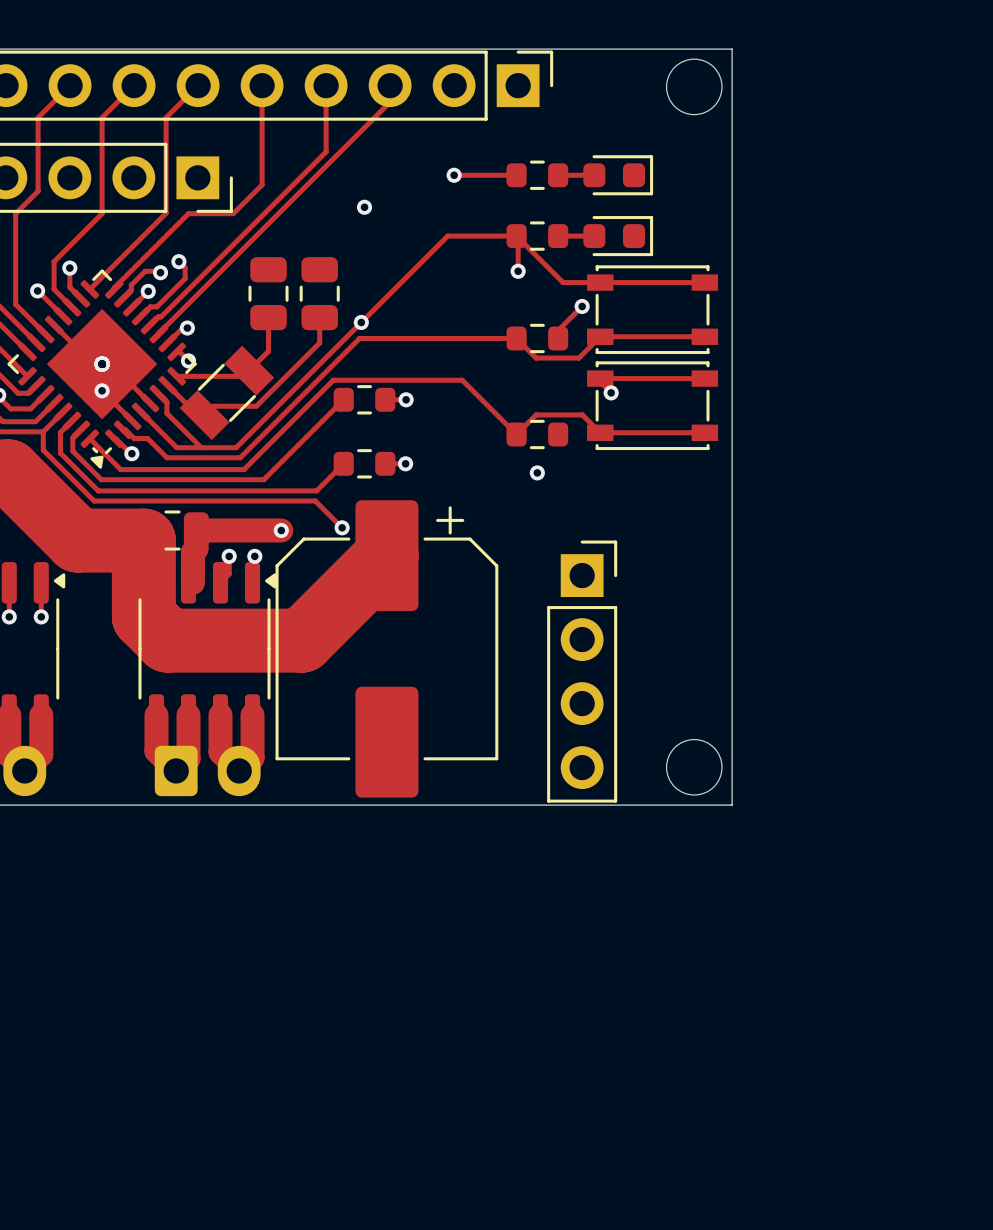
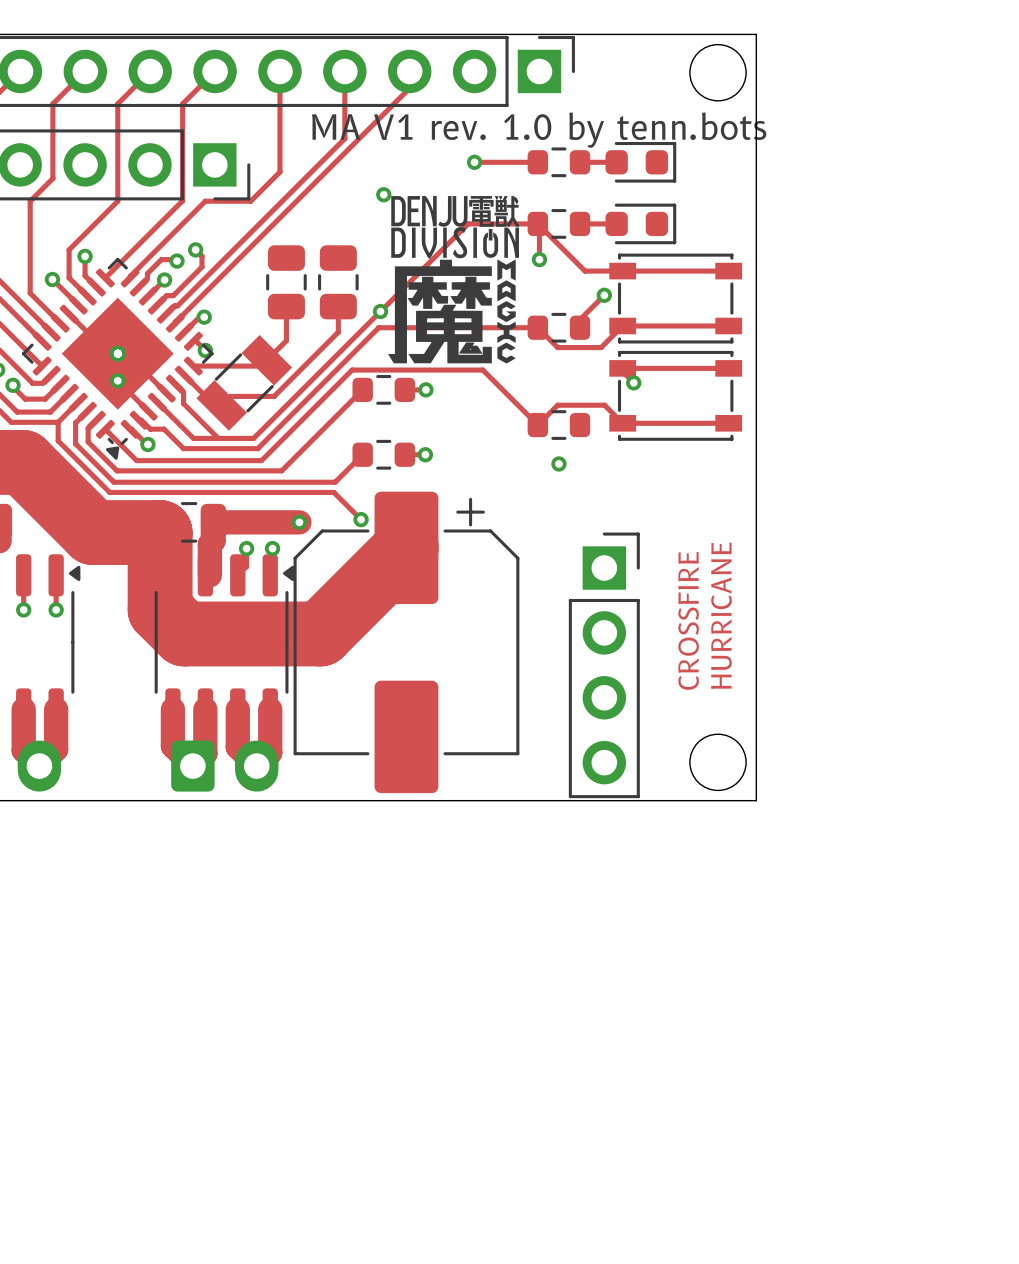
text: none -> MA V1 rev. 1.0 by tenn.bots (539, 130)
drawing: none -> [388, 196, 519, 364]
text: none -> HURRICANE (721, 615)
text: none -> CROSSFIRE (688, 620)

